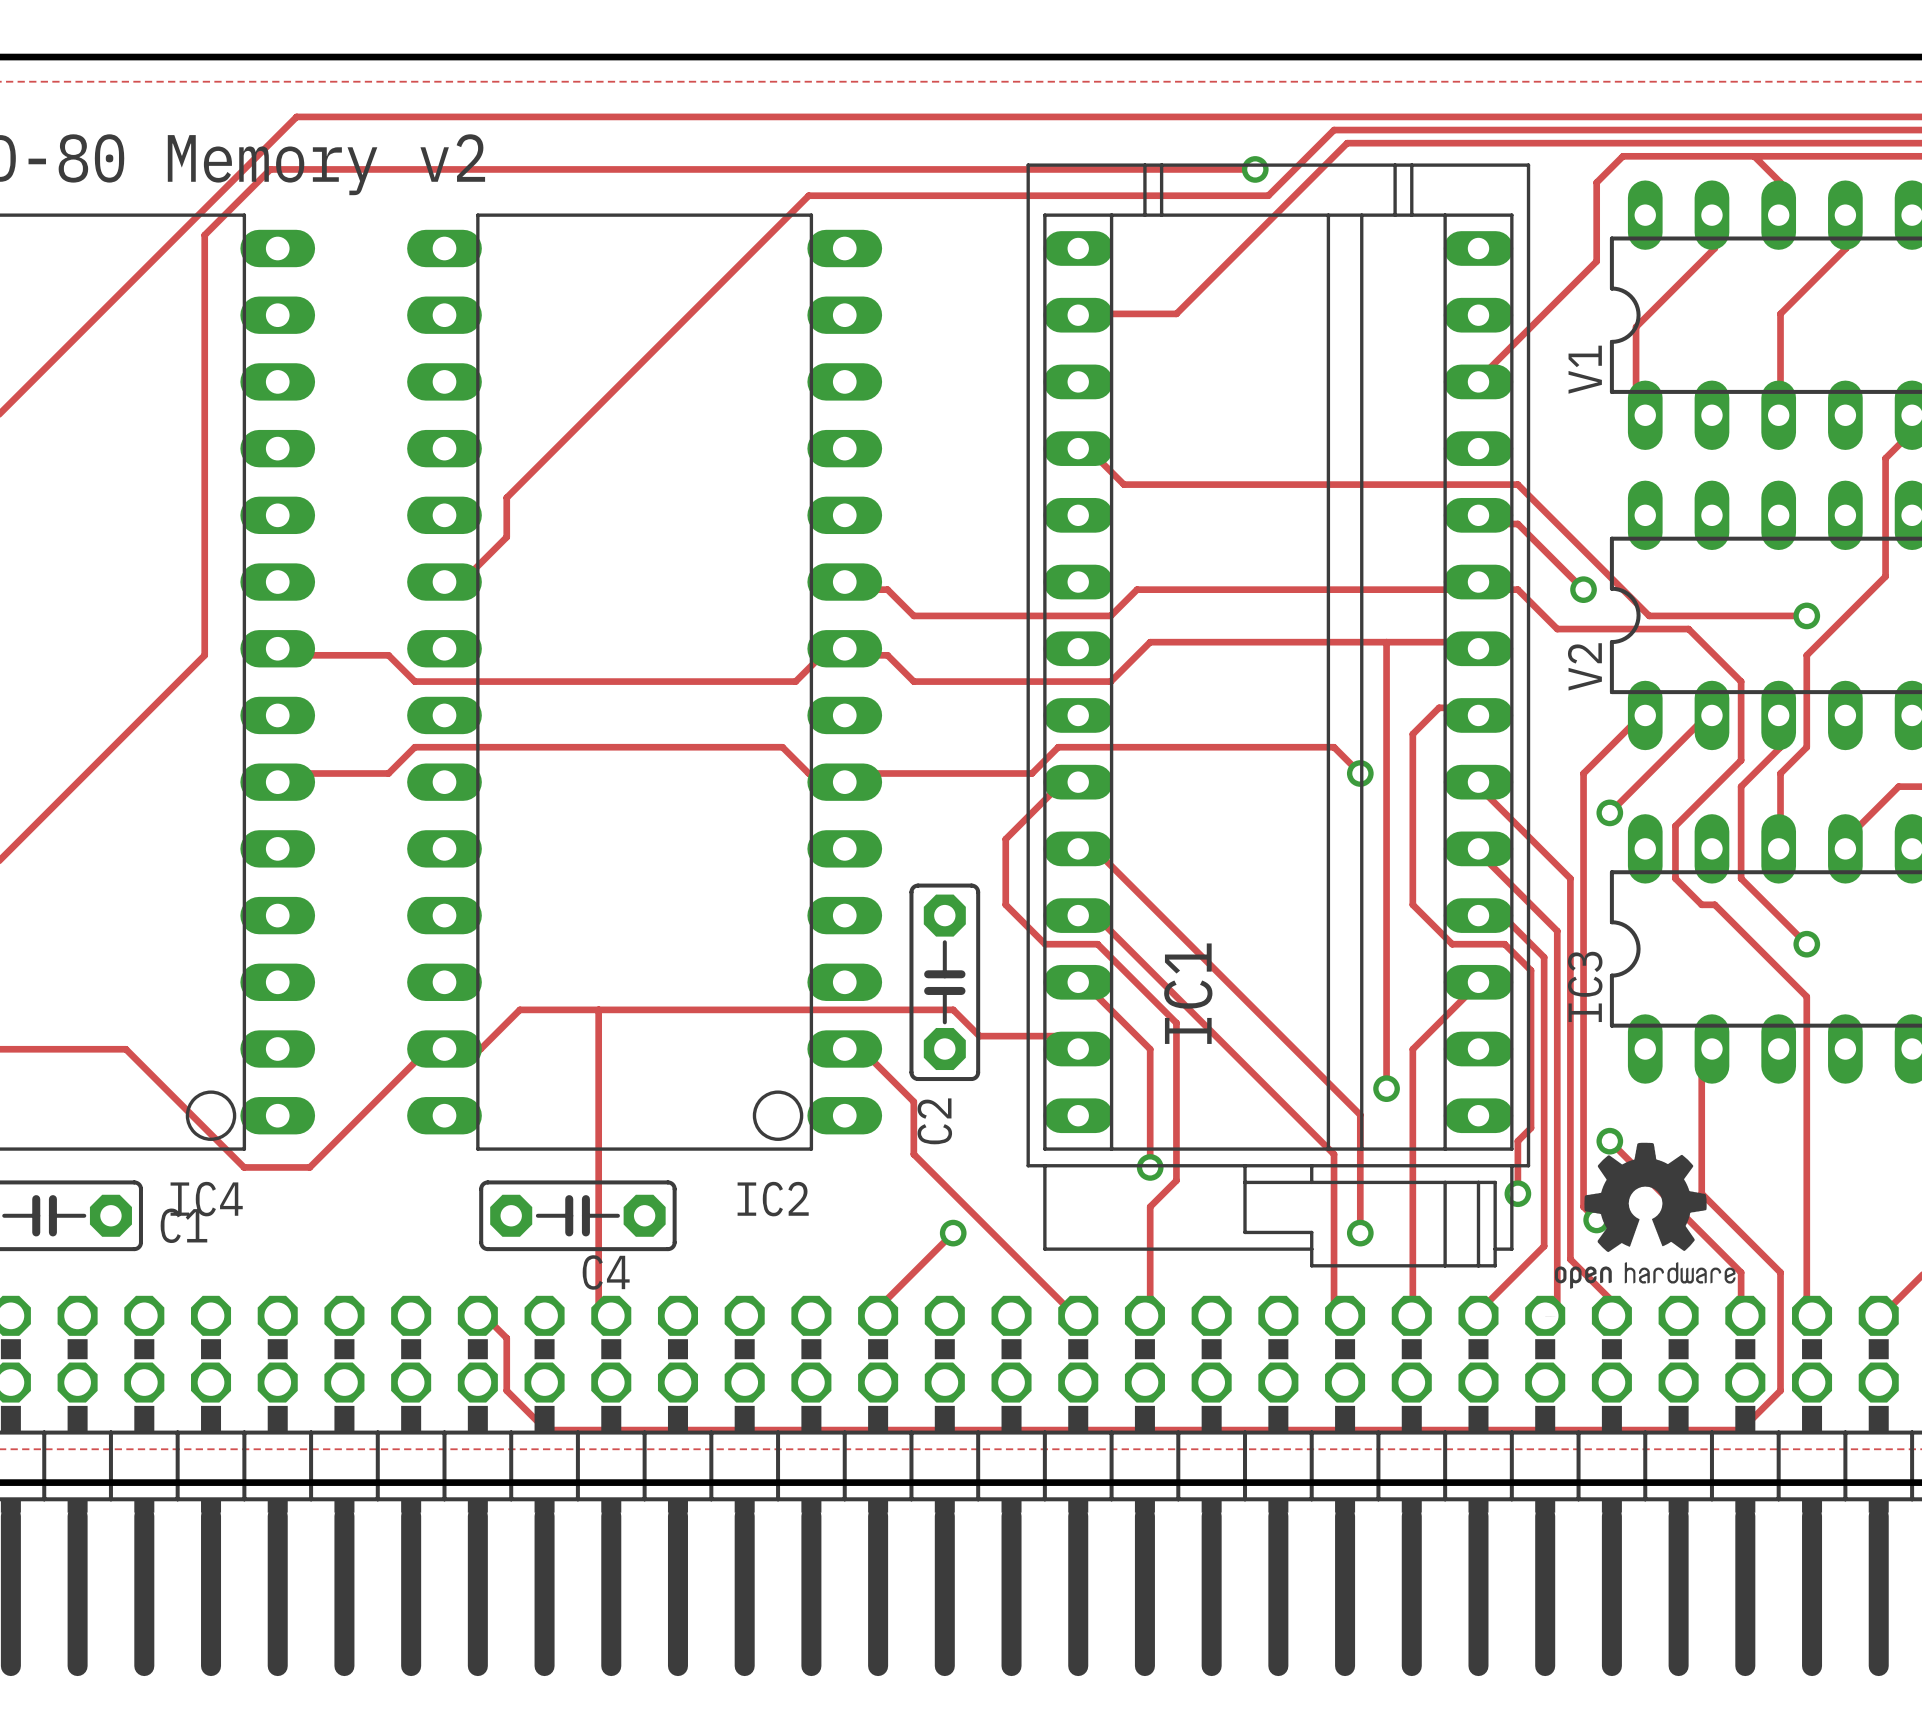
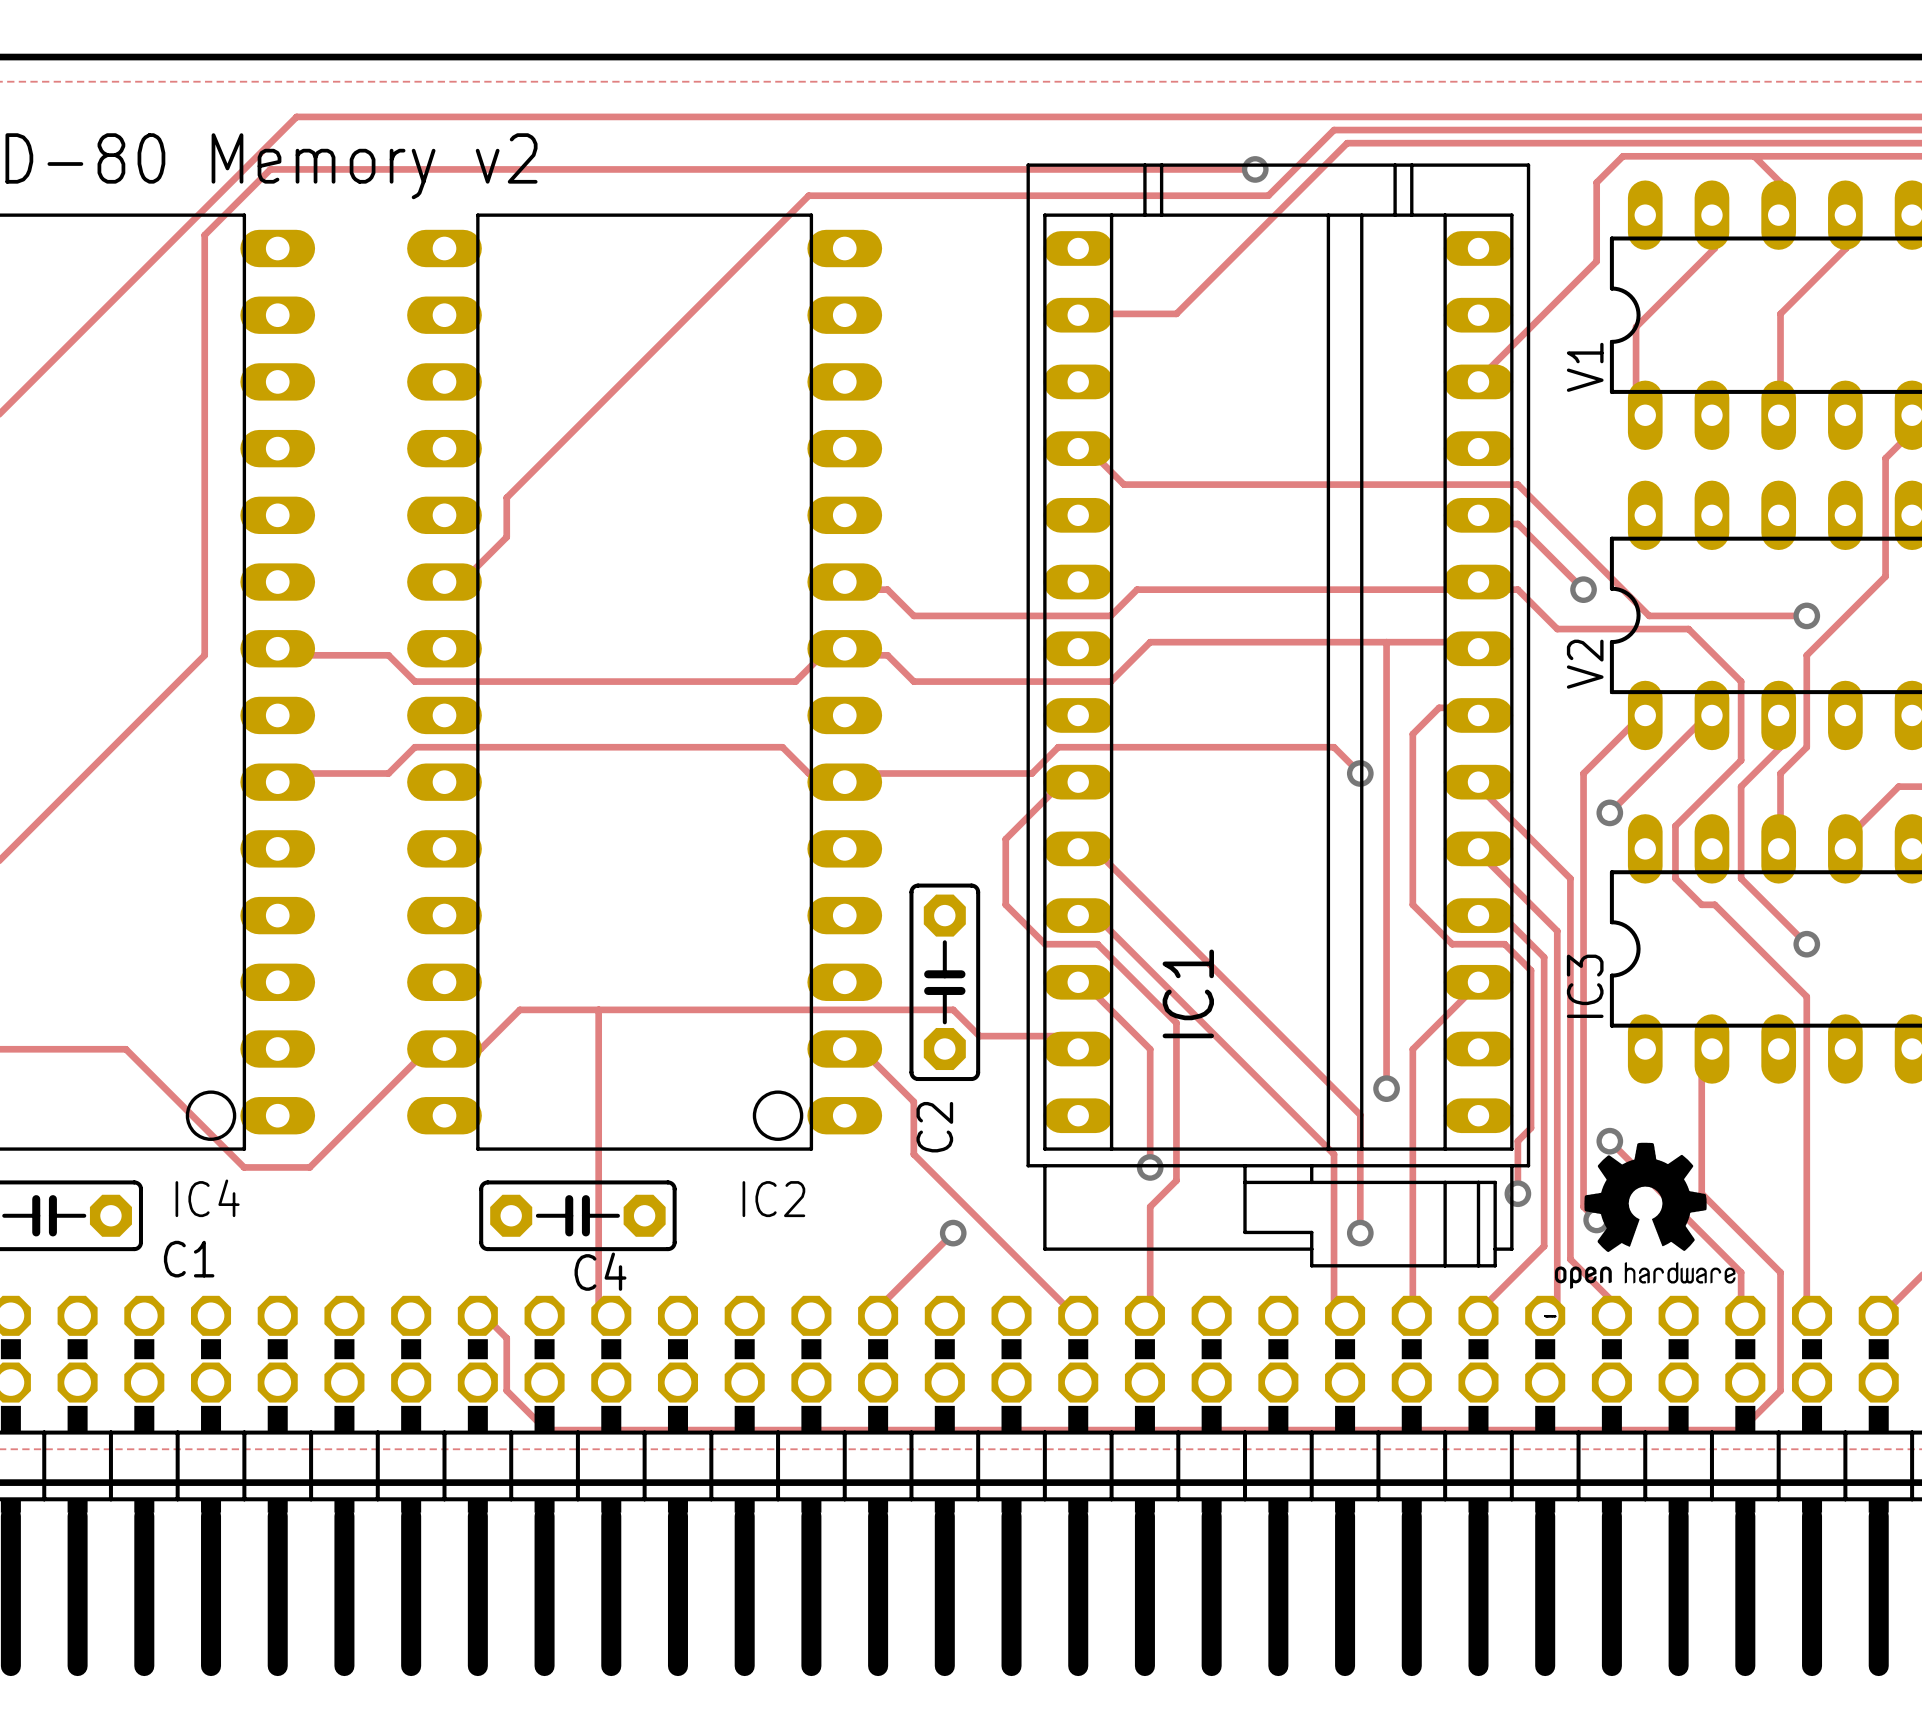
C1 name position: C1 (183, 1225) -> C1 (189, 1259)

